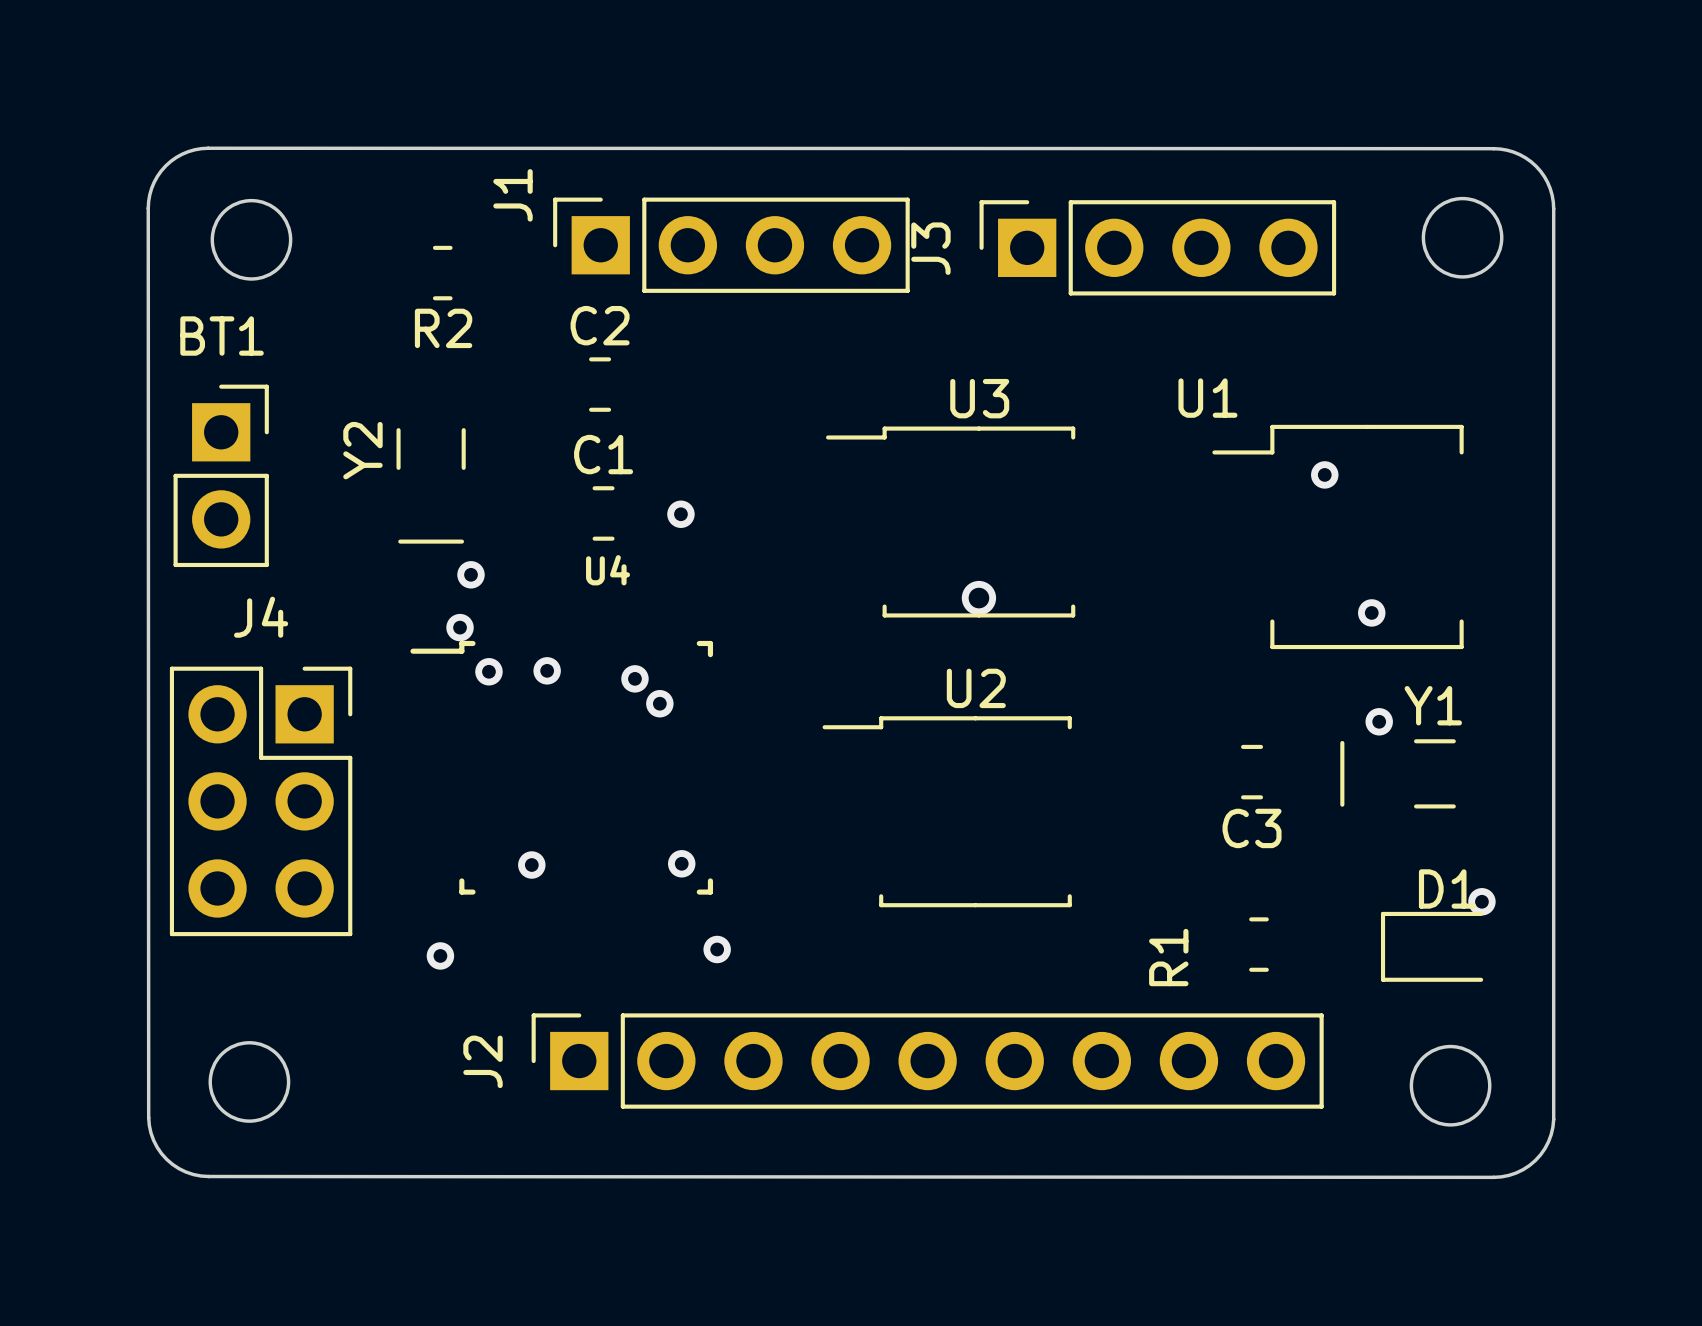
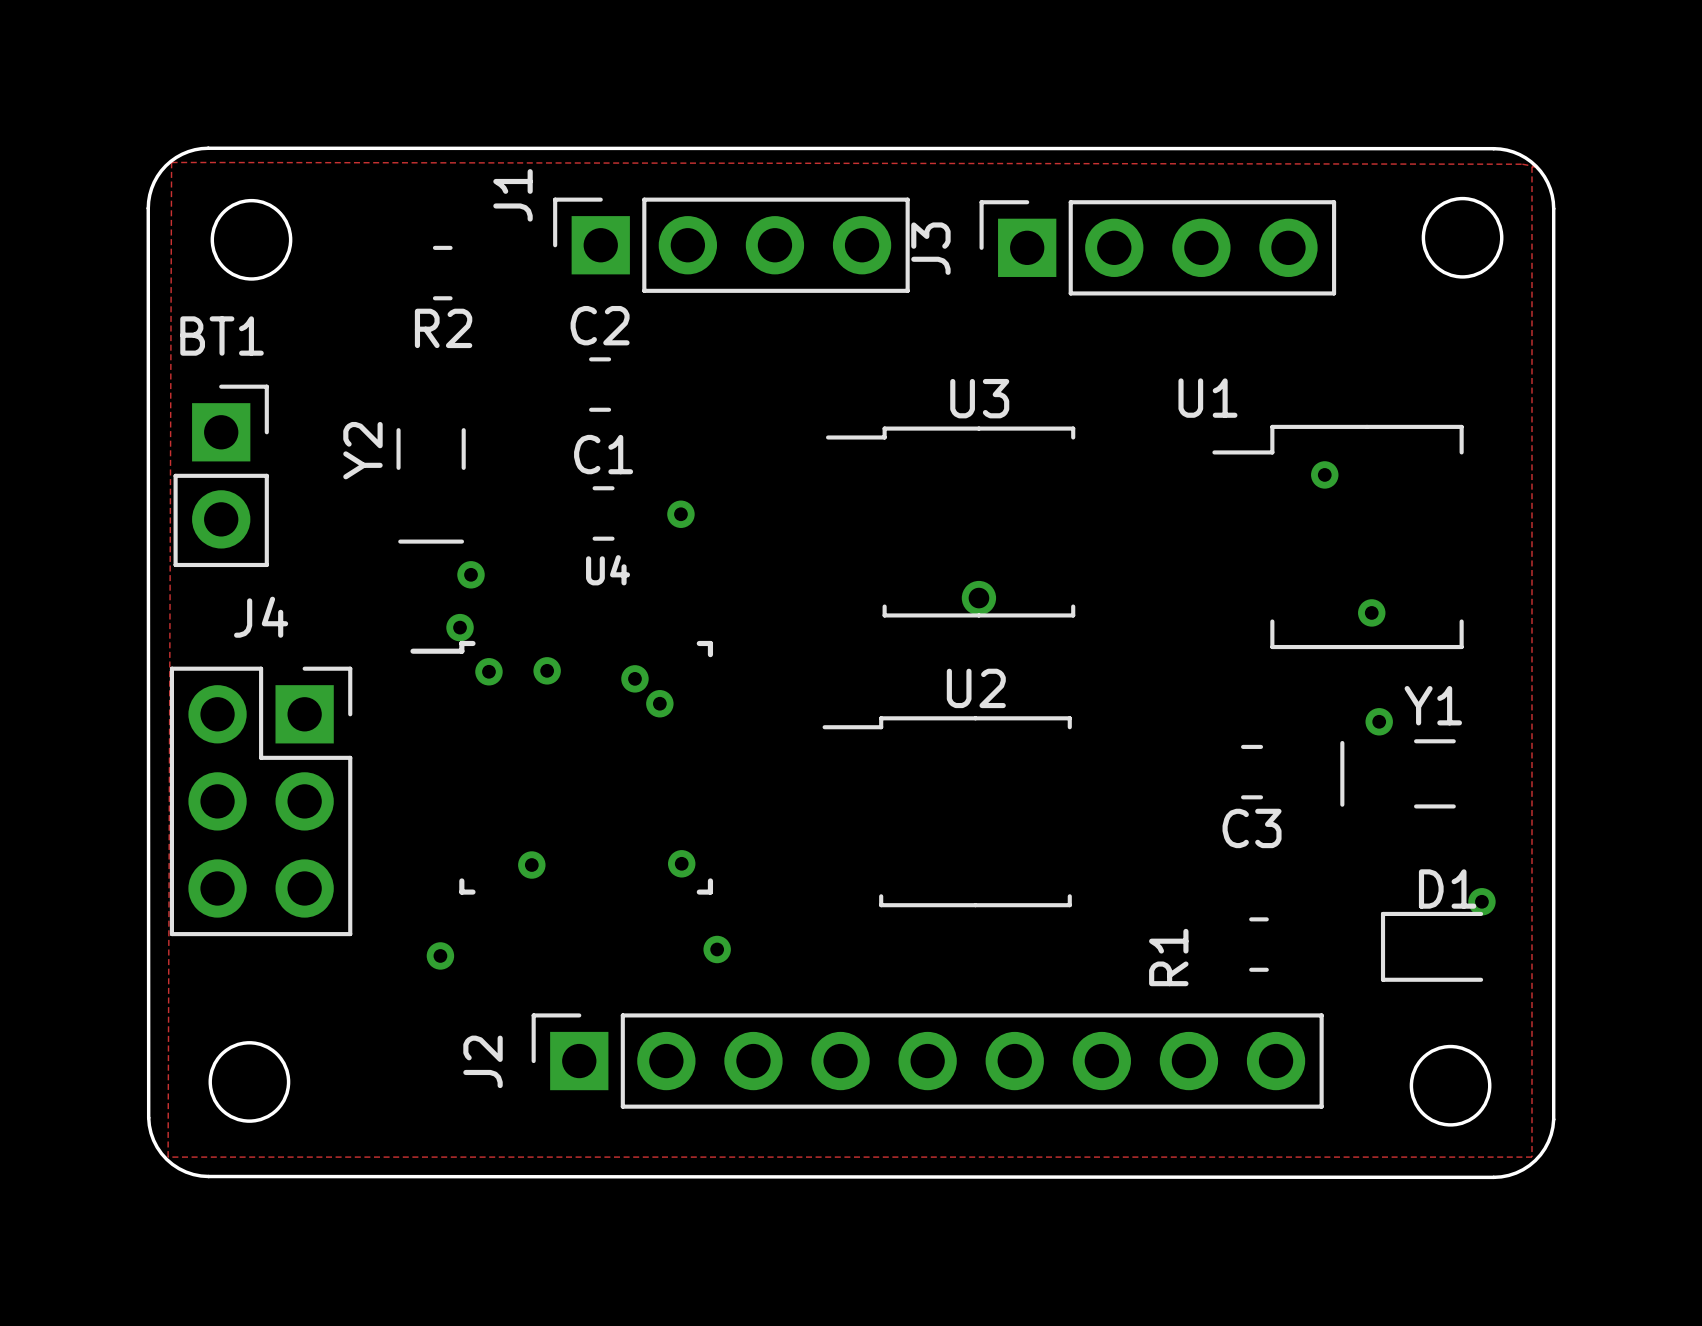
zone outline: none -> (171, 162) (168, 1157) (1531, 1157) (1531, 166) (1536, 166) (1522, 164) (171, 162)

